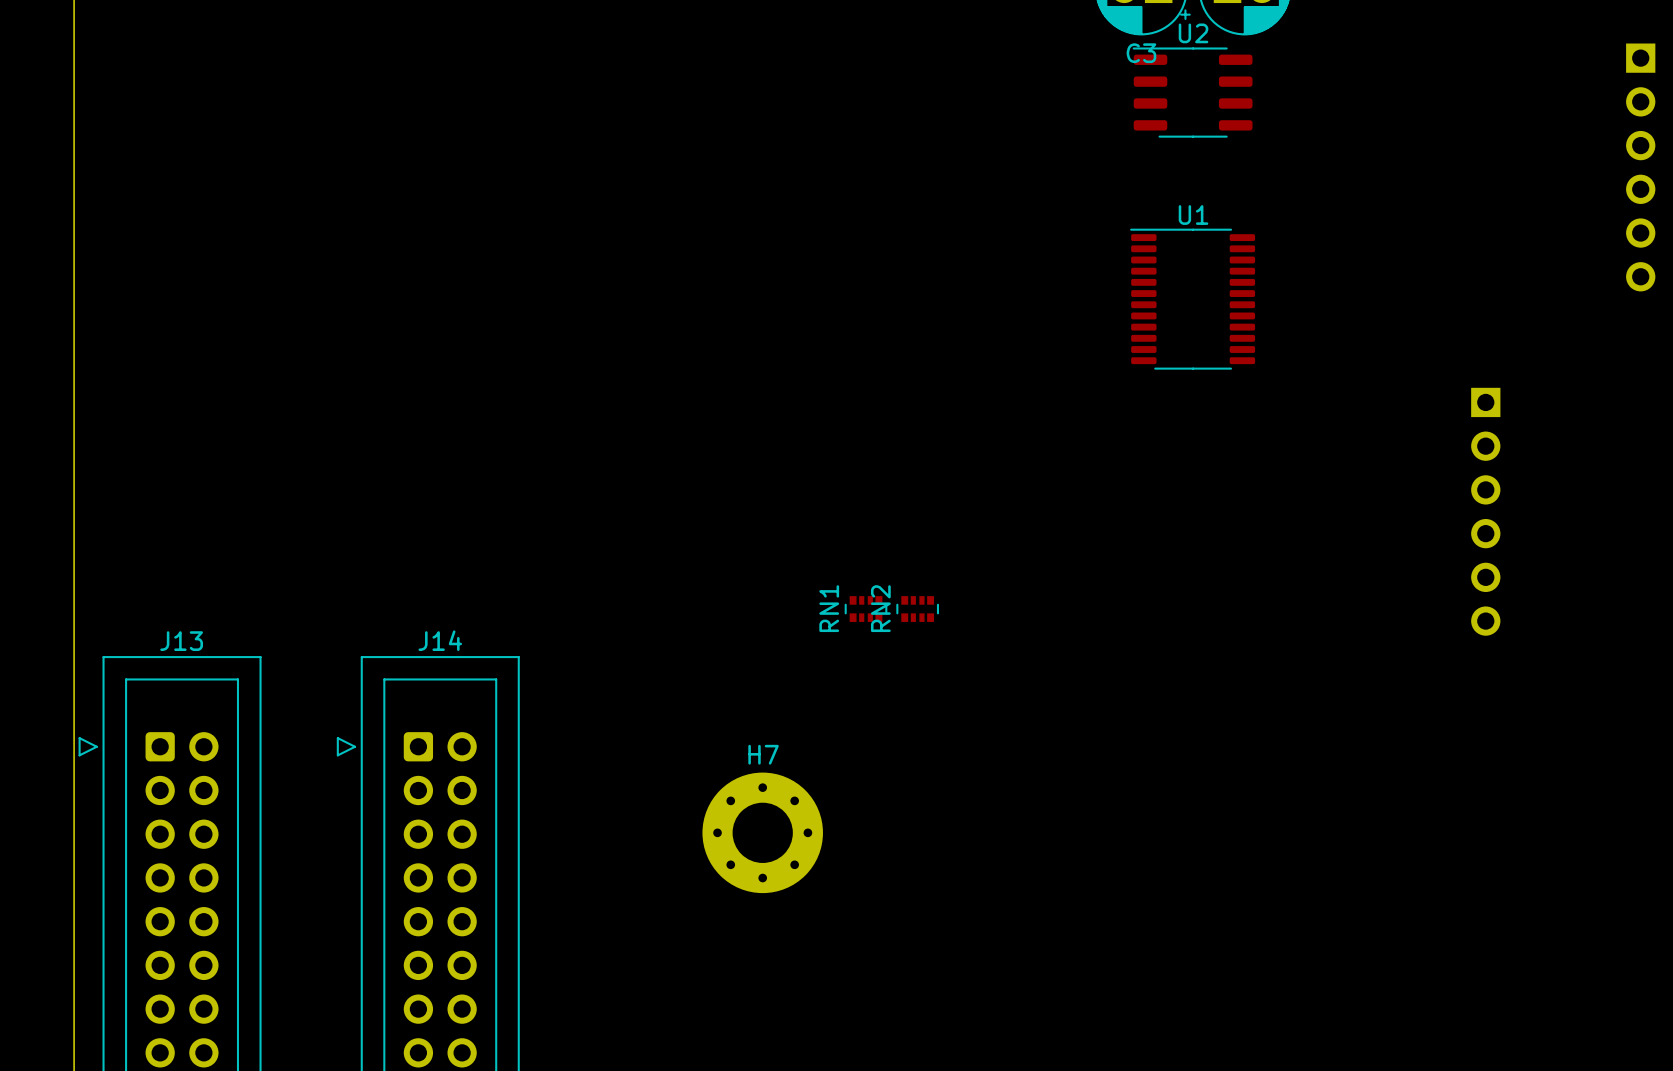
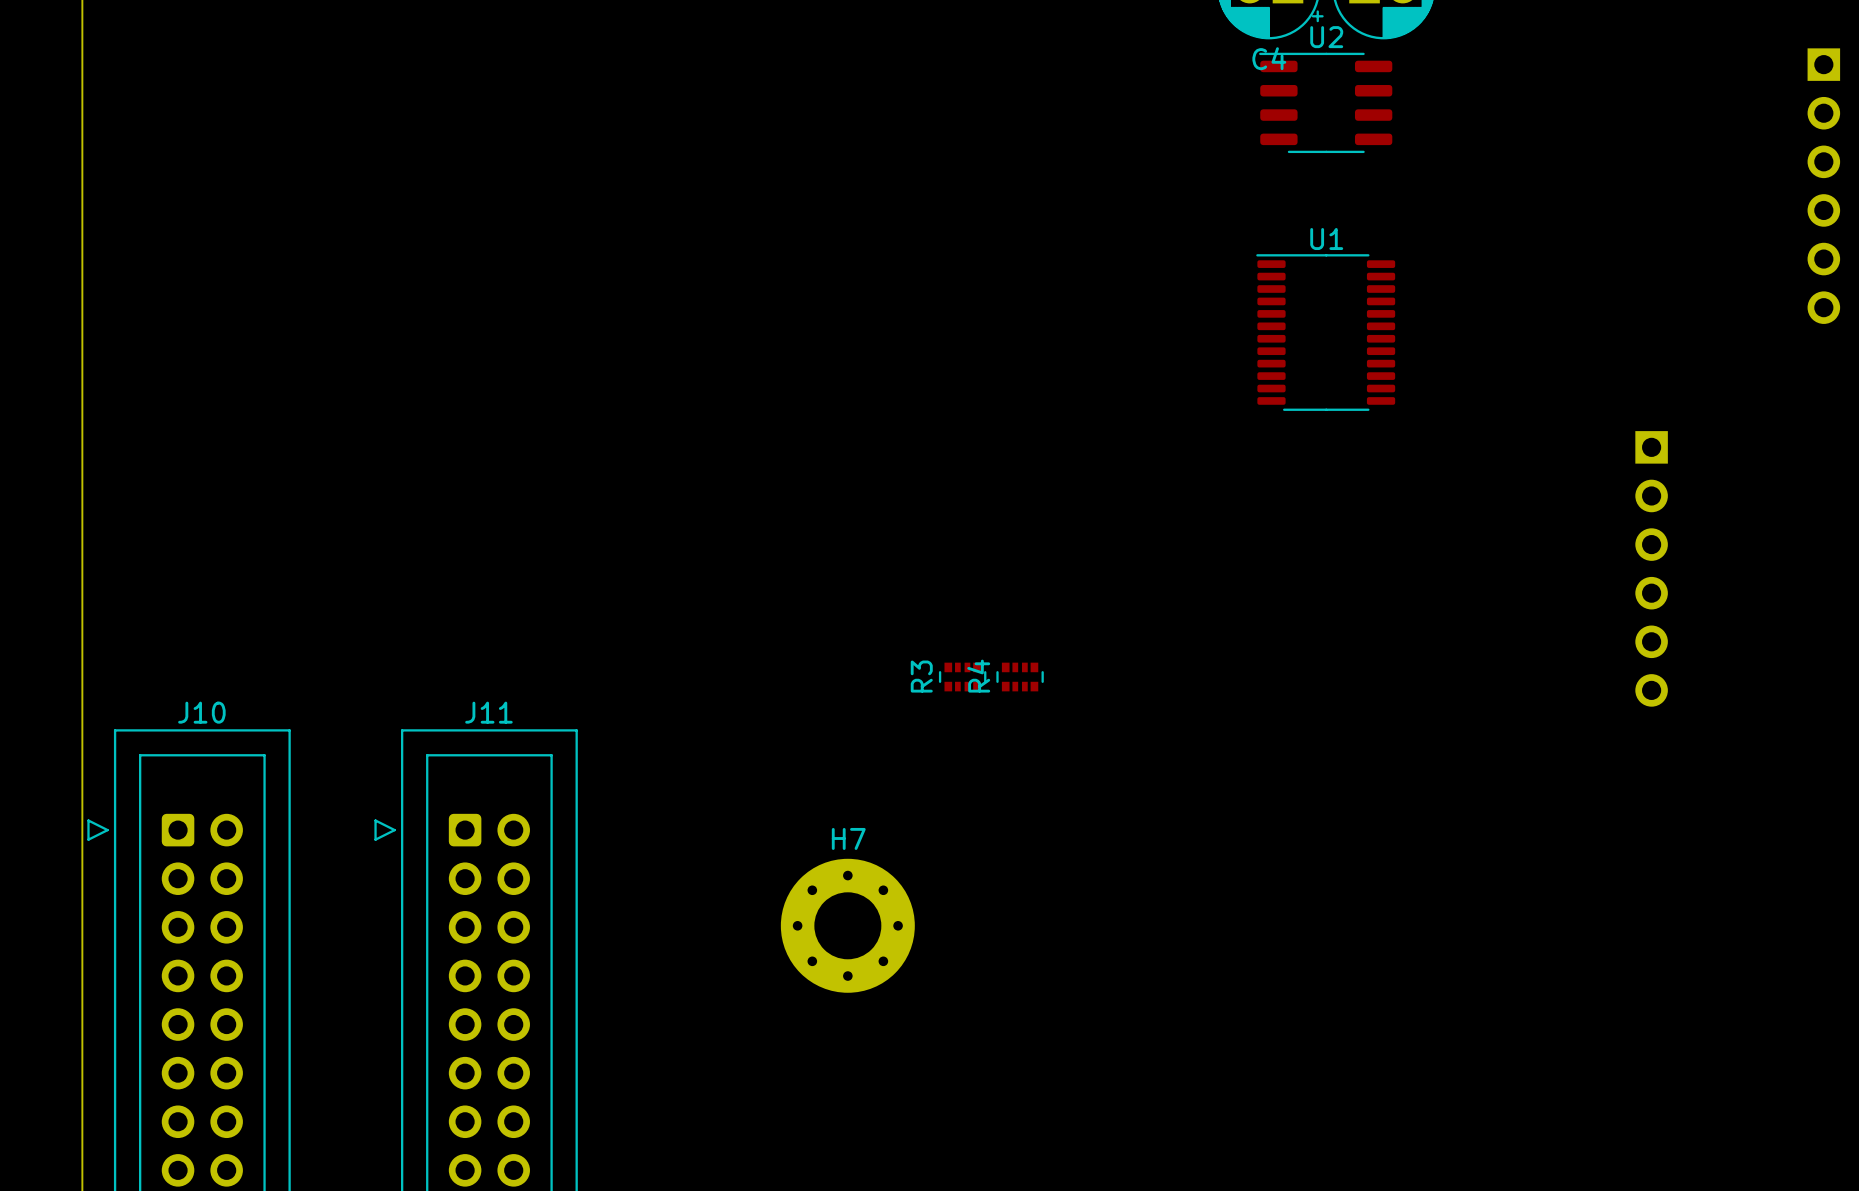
C3 name: C3 (1141, 53) -> C4 (1269, 58)
RN1 name: RN1 (829, 608) -> R3 (921, 676)
RN2 name: RN2 (880, 608) -> R4 (978, 676)
J14 name: J14 (440, 640) -> J11 (488, 712)
J13 name: J13 (181, 641) -> J10 (201, 712)

